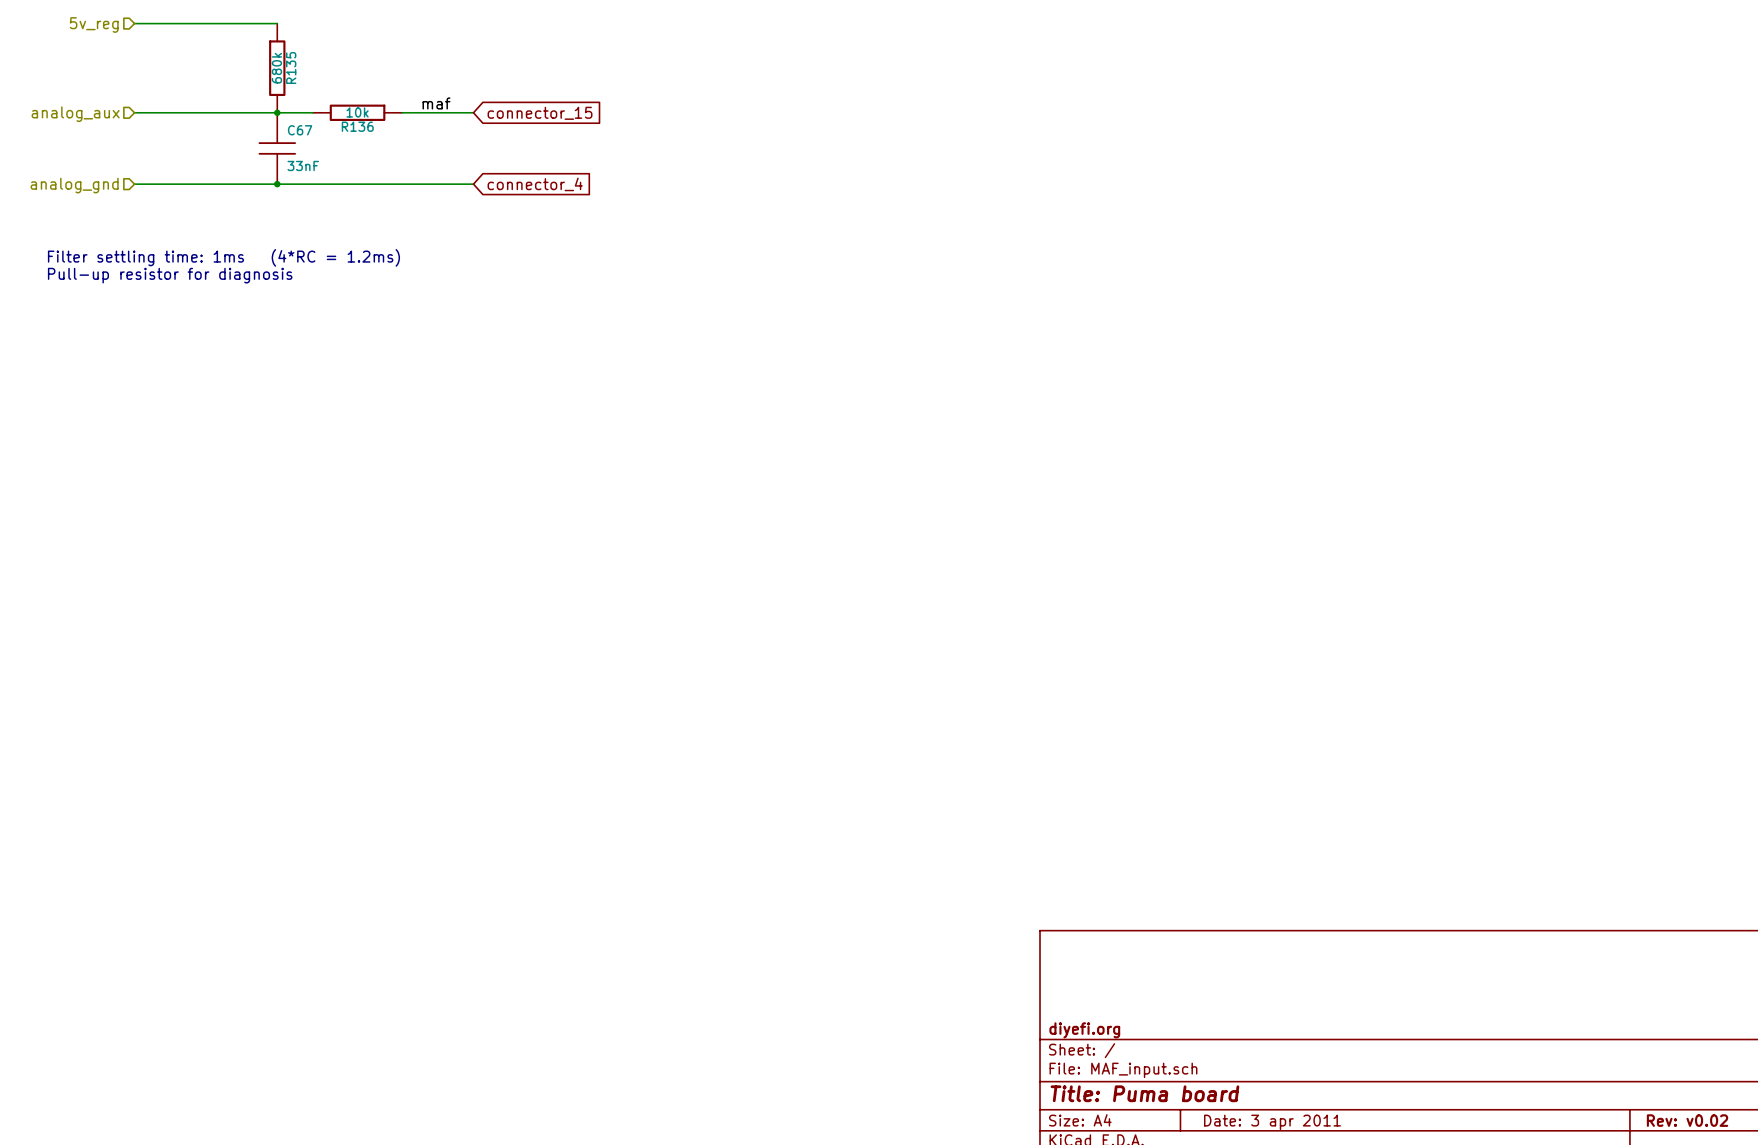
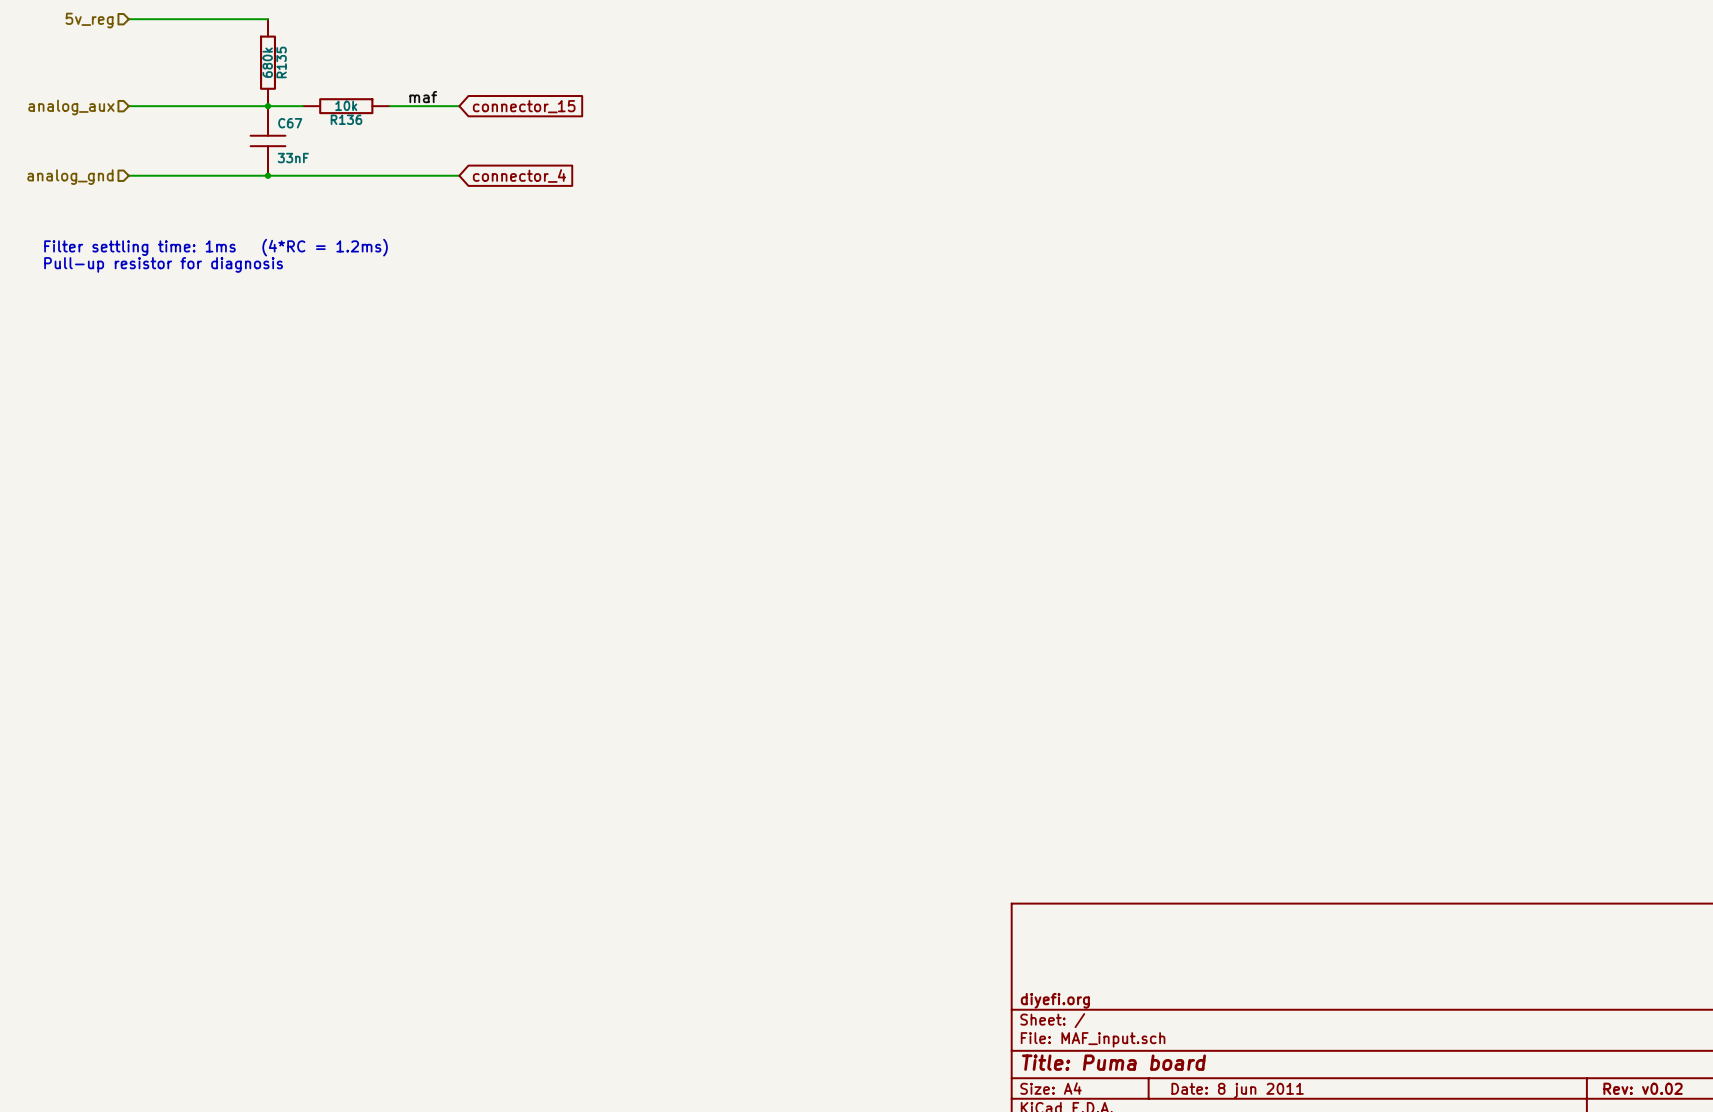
title block: Date: 3 apr 2011 (1272, 1122) -> Date: 8 jun 2011 (1237, 1090)

